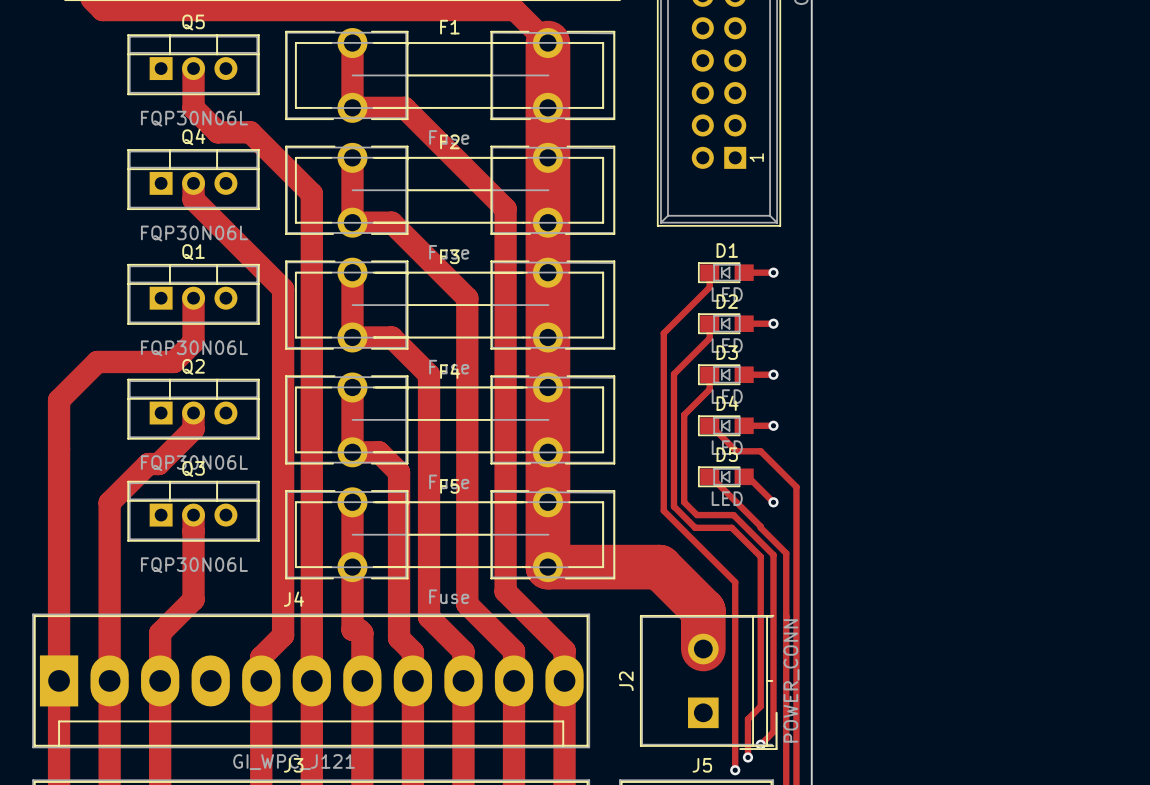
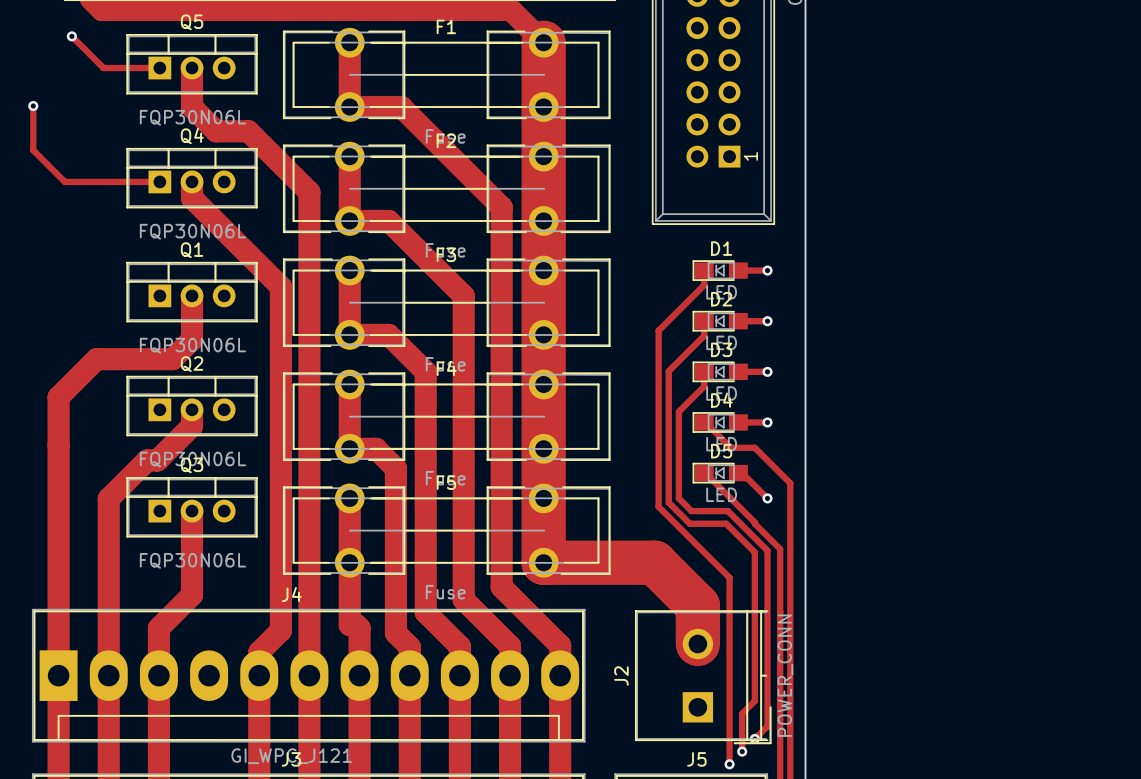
track: none -> (71, 36) (103, 68) (159, 68)
via: none -> (71, 36)
track: none -> (33, 106) (33, 150) (64, 181) (159, 181)
via: none -> (33, 106)

